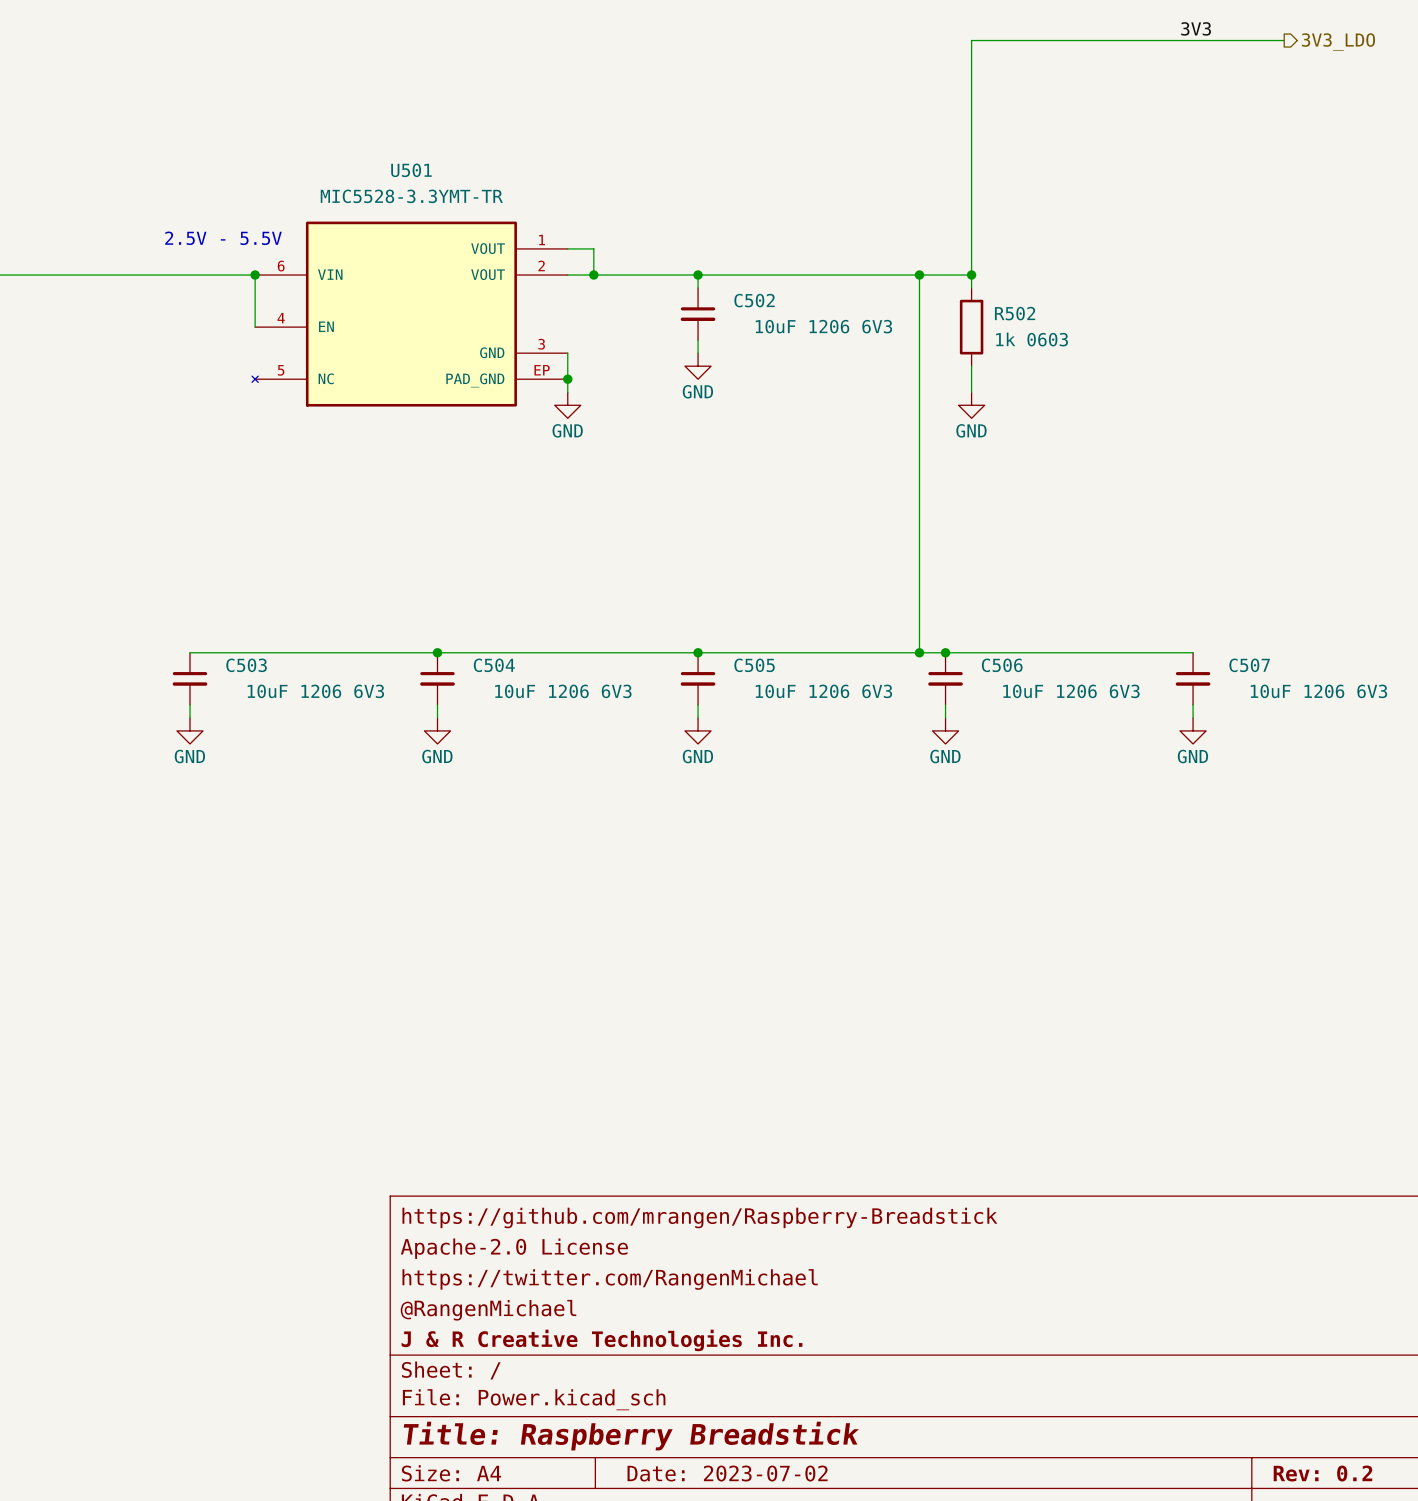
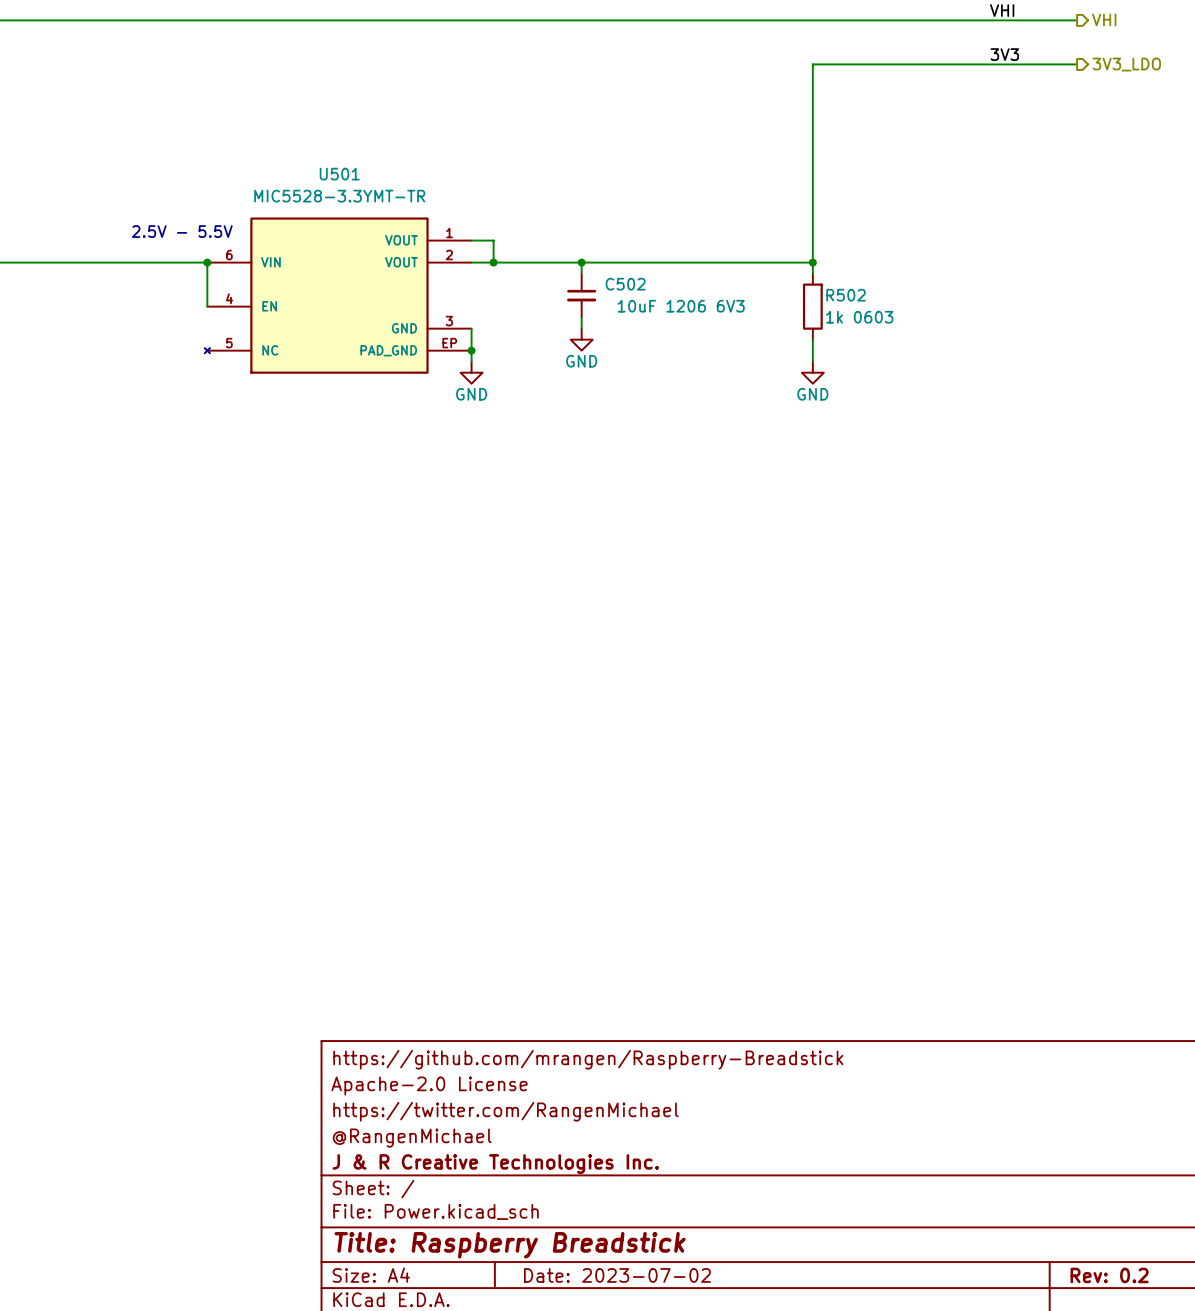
wire: (919, 275) (919, 652) -> none
junction: (919, 275) -> none
wire: (189, 652) (1193, 652) -> none
junction: (437, 652) -> none
junction: (698, 652) -> none
junction: (919, 652) -> none
junction: (945, 652) -> none
C503: 10uF 1206 6V3 (189, 678) -> none
C504: 10uF 1206 6V3 (437, 678) -> none
C505: 10uF 1206 6V3 (698, 678) -> none
C506: 10uF 1206 6V3 (945, 678) -> none
C507: 10uF 1206 6V3 (1193, 678) -> none
wire: (189, 704) (189, 717) -> none
wire: (437, 704) (437, 717) -> none
wire: (698, 704) (698, 717) -> none
wire: (945, 704) (945, 717) -> none
wire: (1193, 704) (1193, 717) -> none
power symbol: GND (189, 730) -> none
power symbol: GND (437, 730) -> none
power symbol: GND (698, 730) -> none
power symbol: GND (945, 730) -> none
power symbol: GND (1193, 730) -> none

